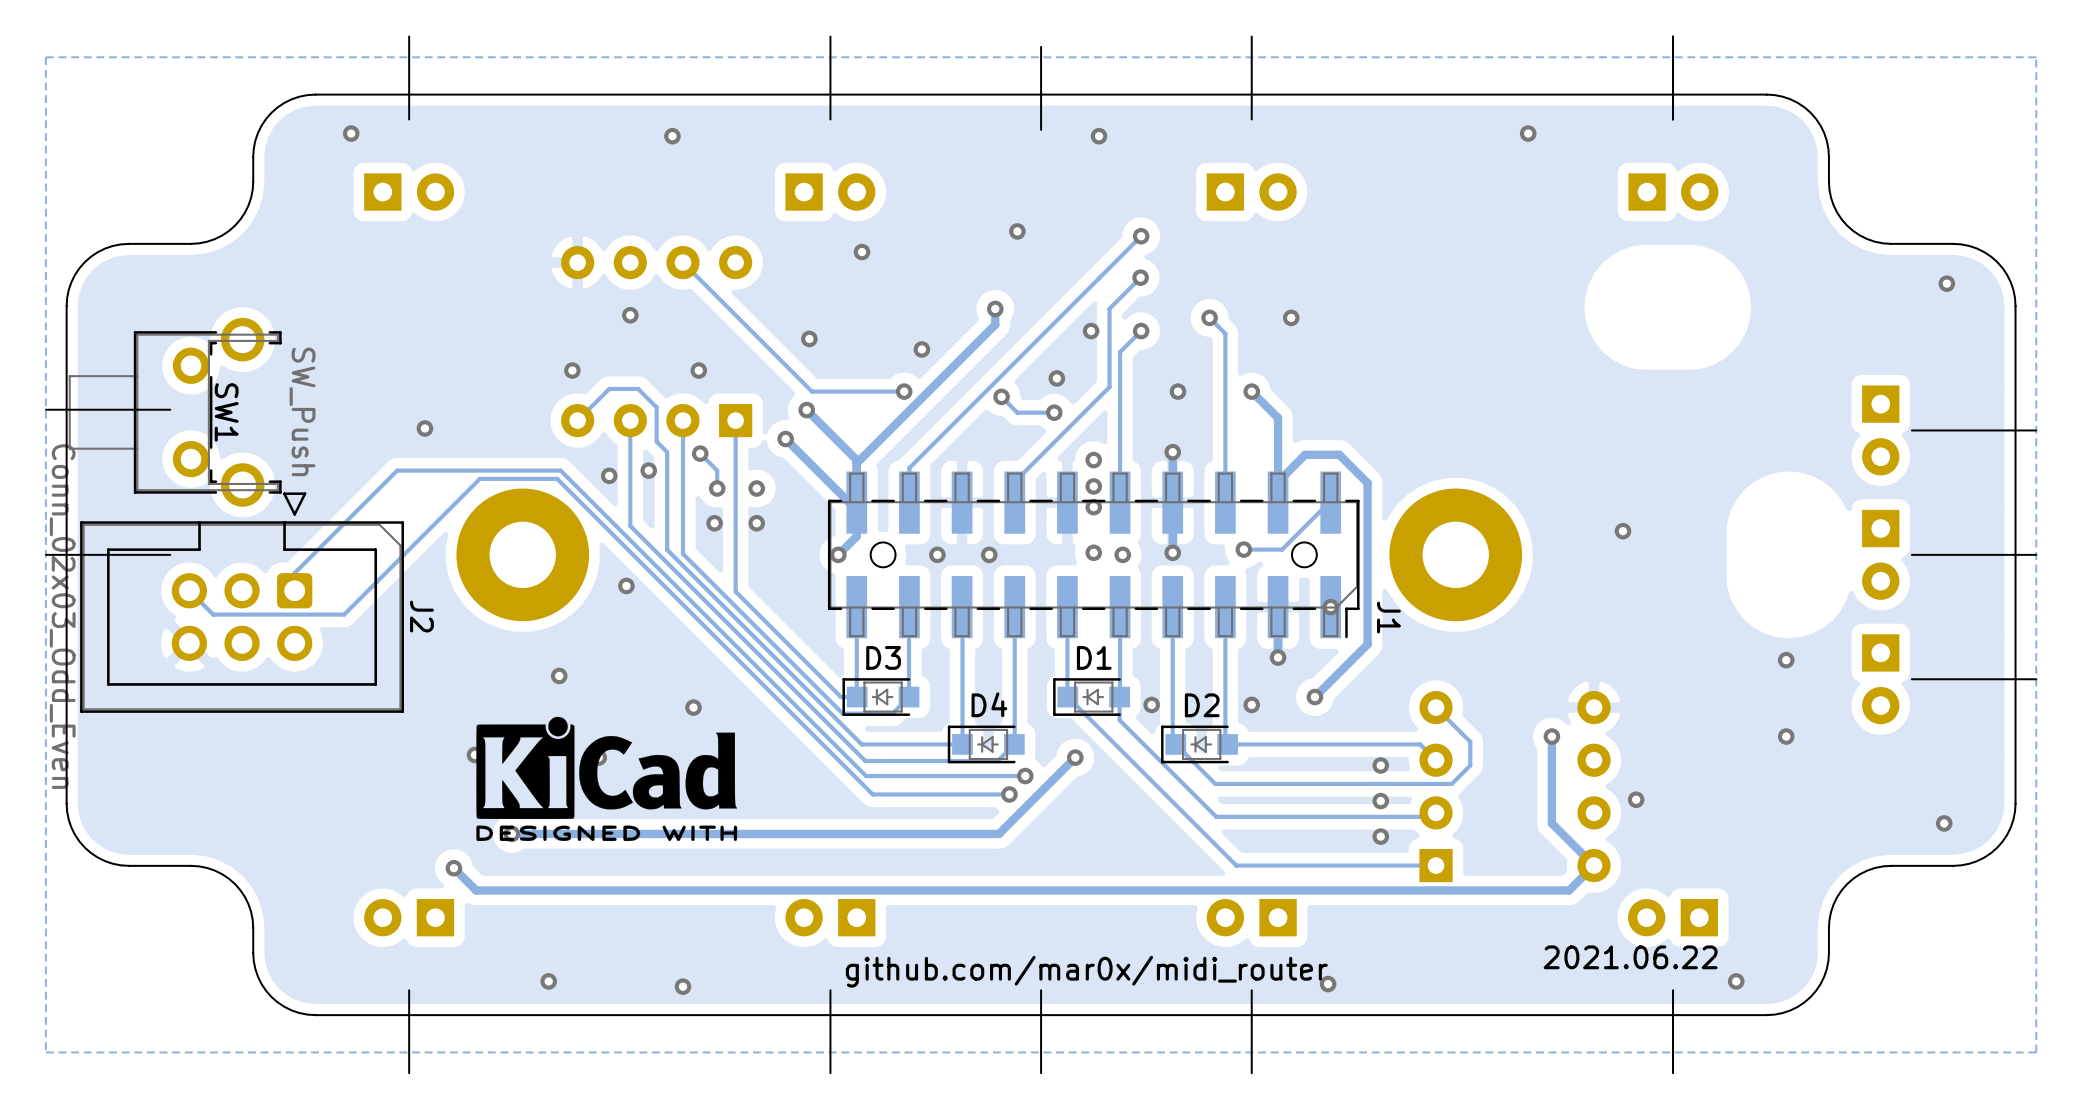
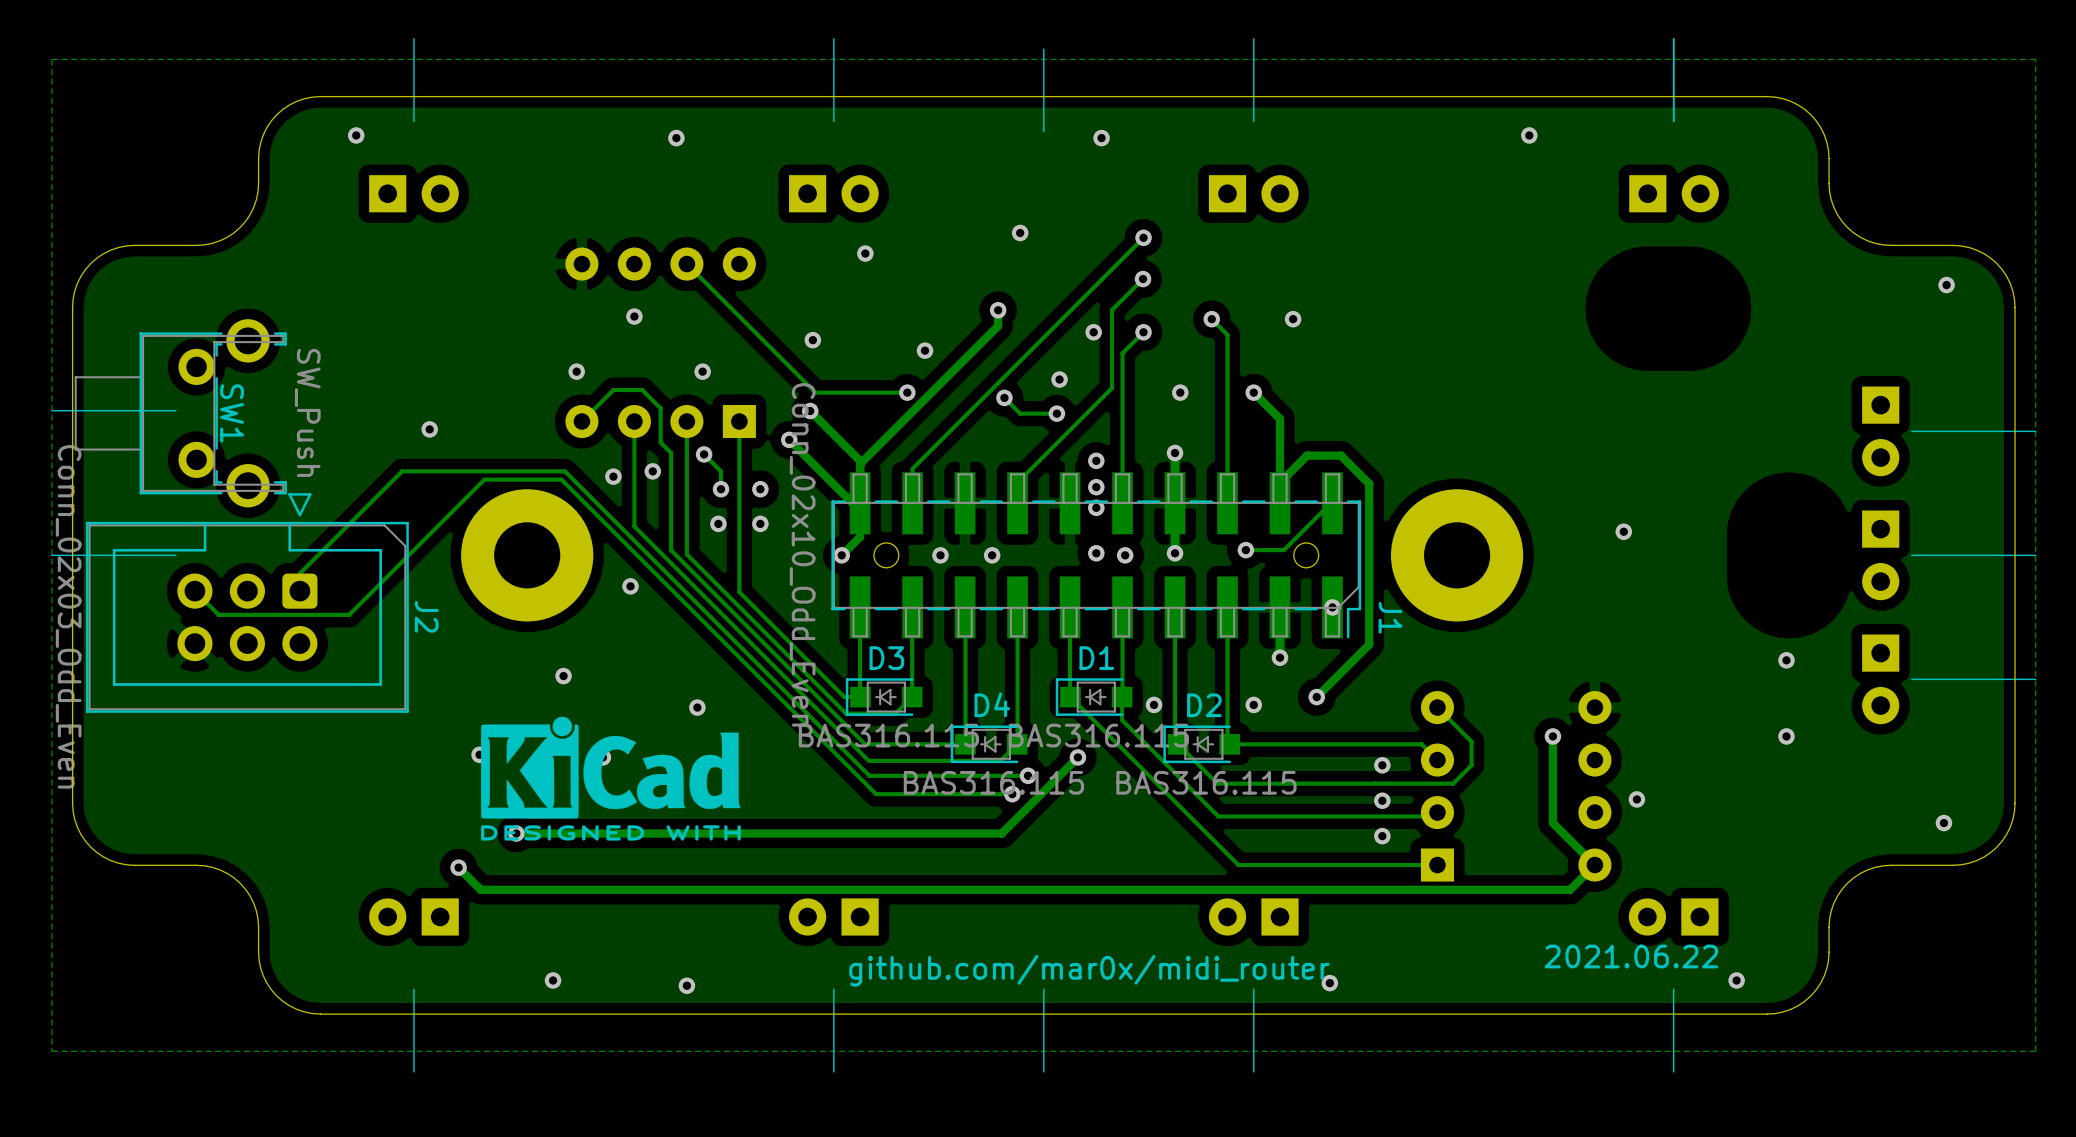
J1 value: none -> Conn_02x10_Odd_Even (802, 554)
D3 value: none -> BAS316.115 (888, 735)
D1 value: none -> BAS316.115 (1098, 735)
D4 value: none -> BAS316.115 (993, 782)
D2 value: none -> BAS316.115 (1206, 782)

